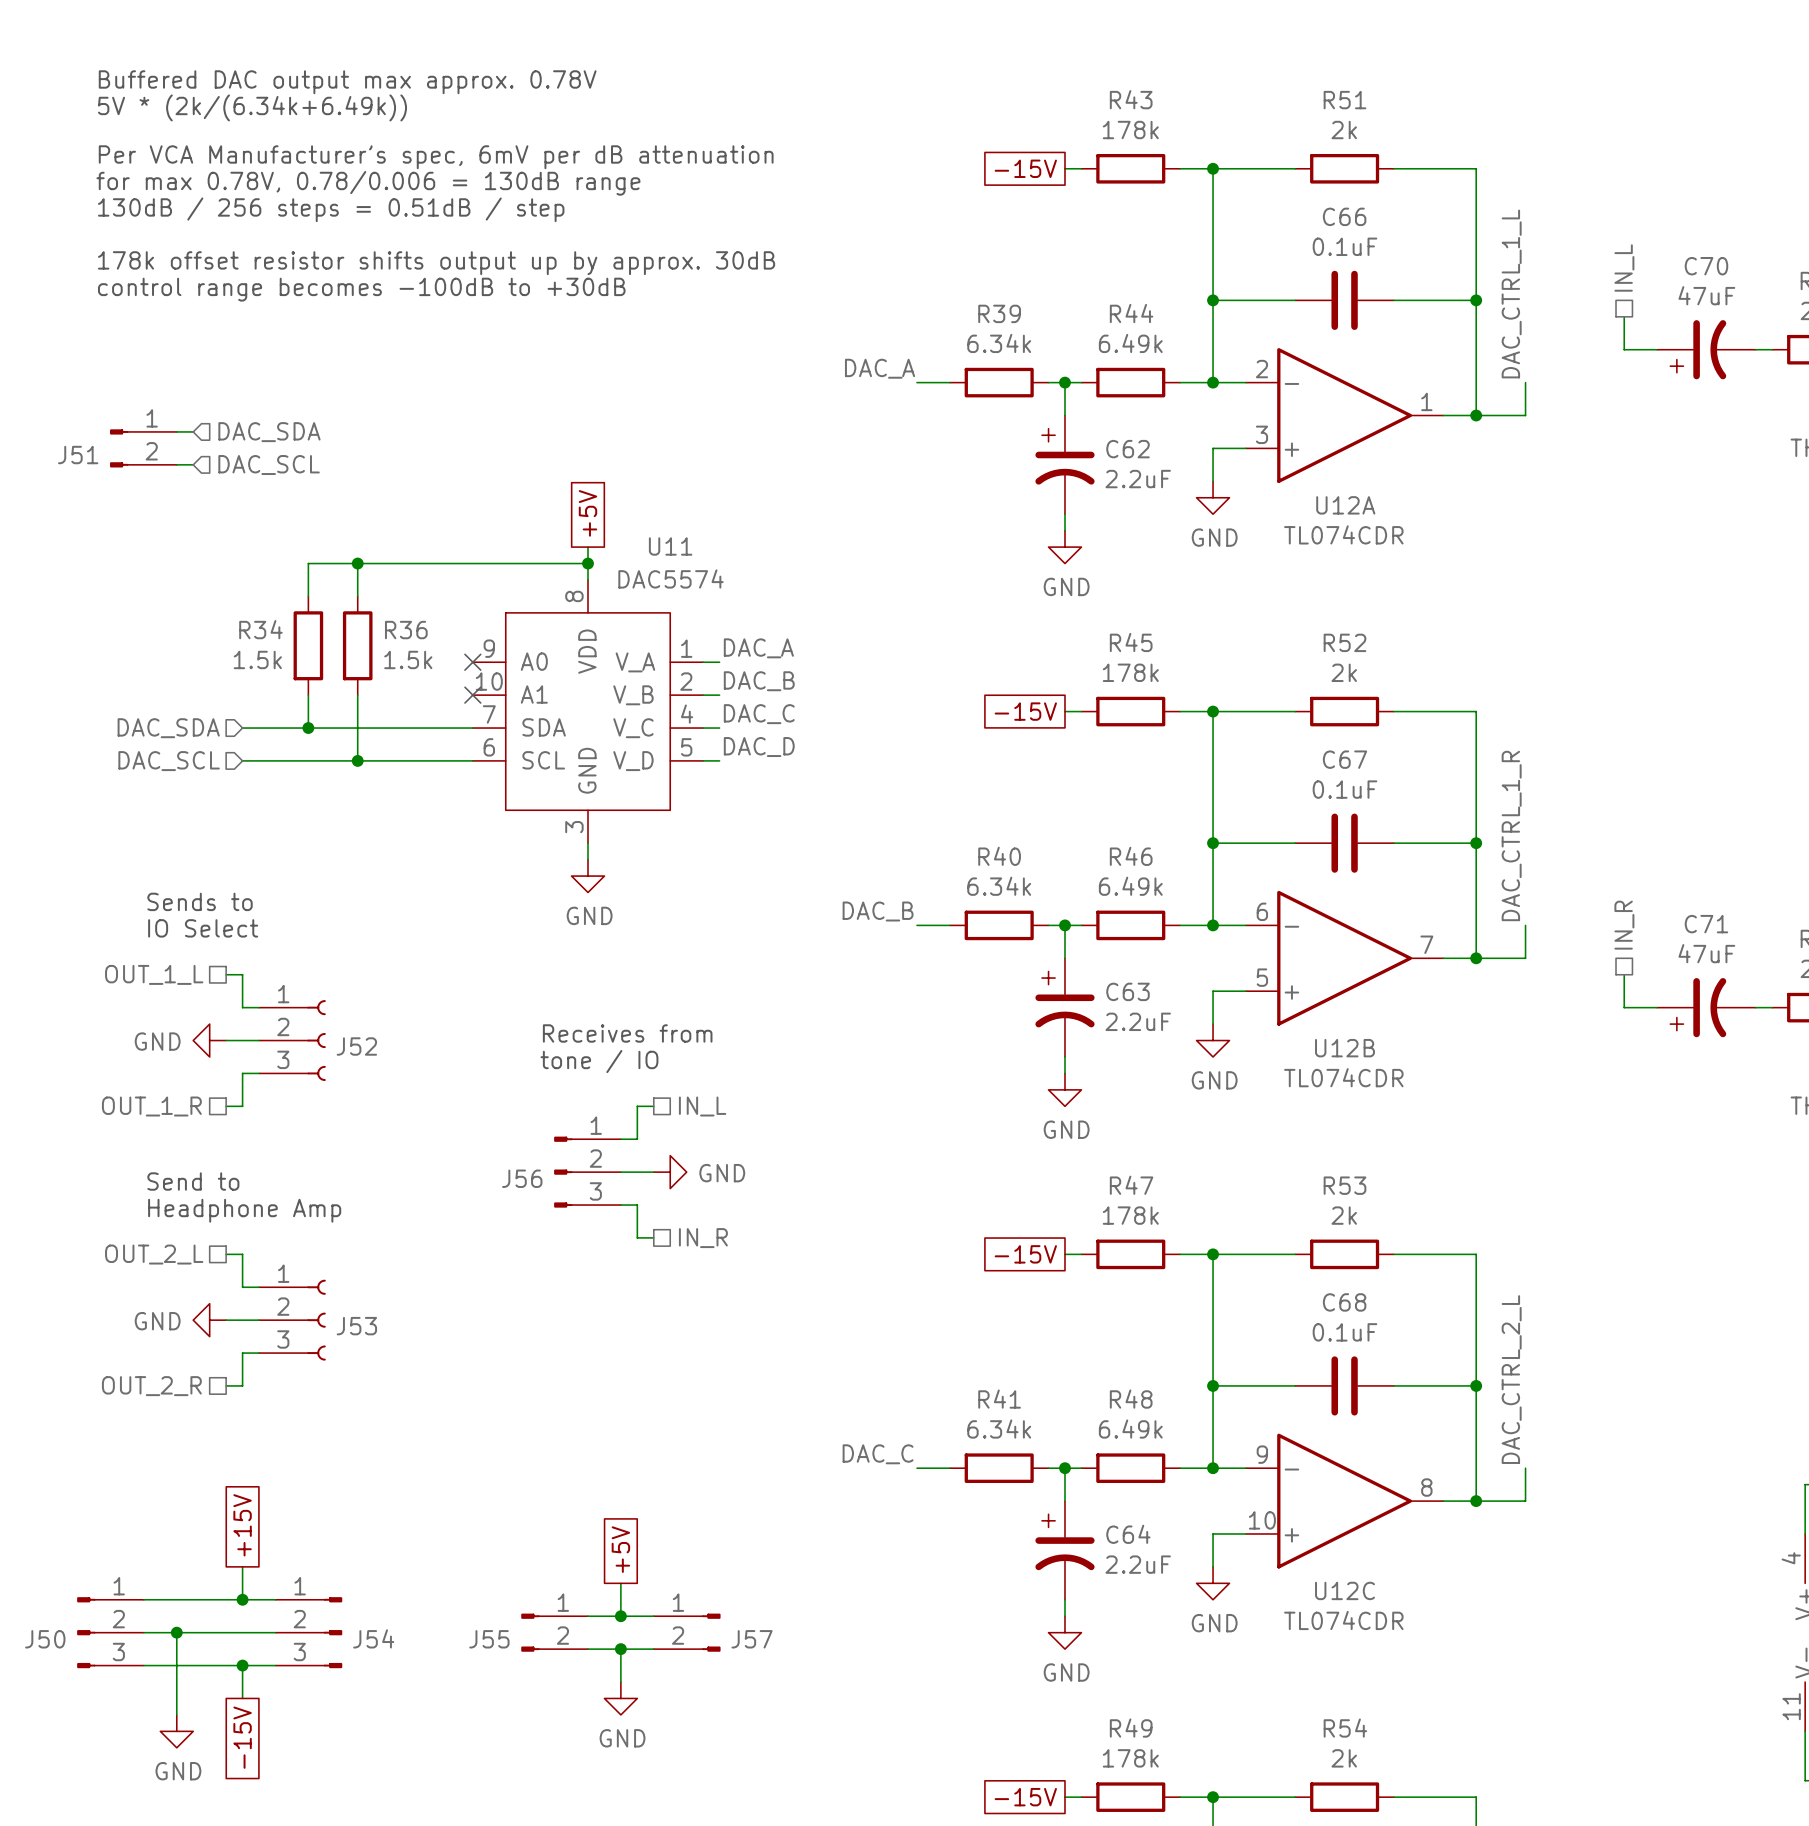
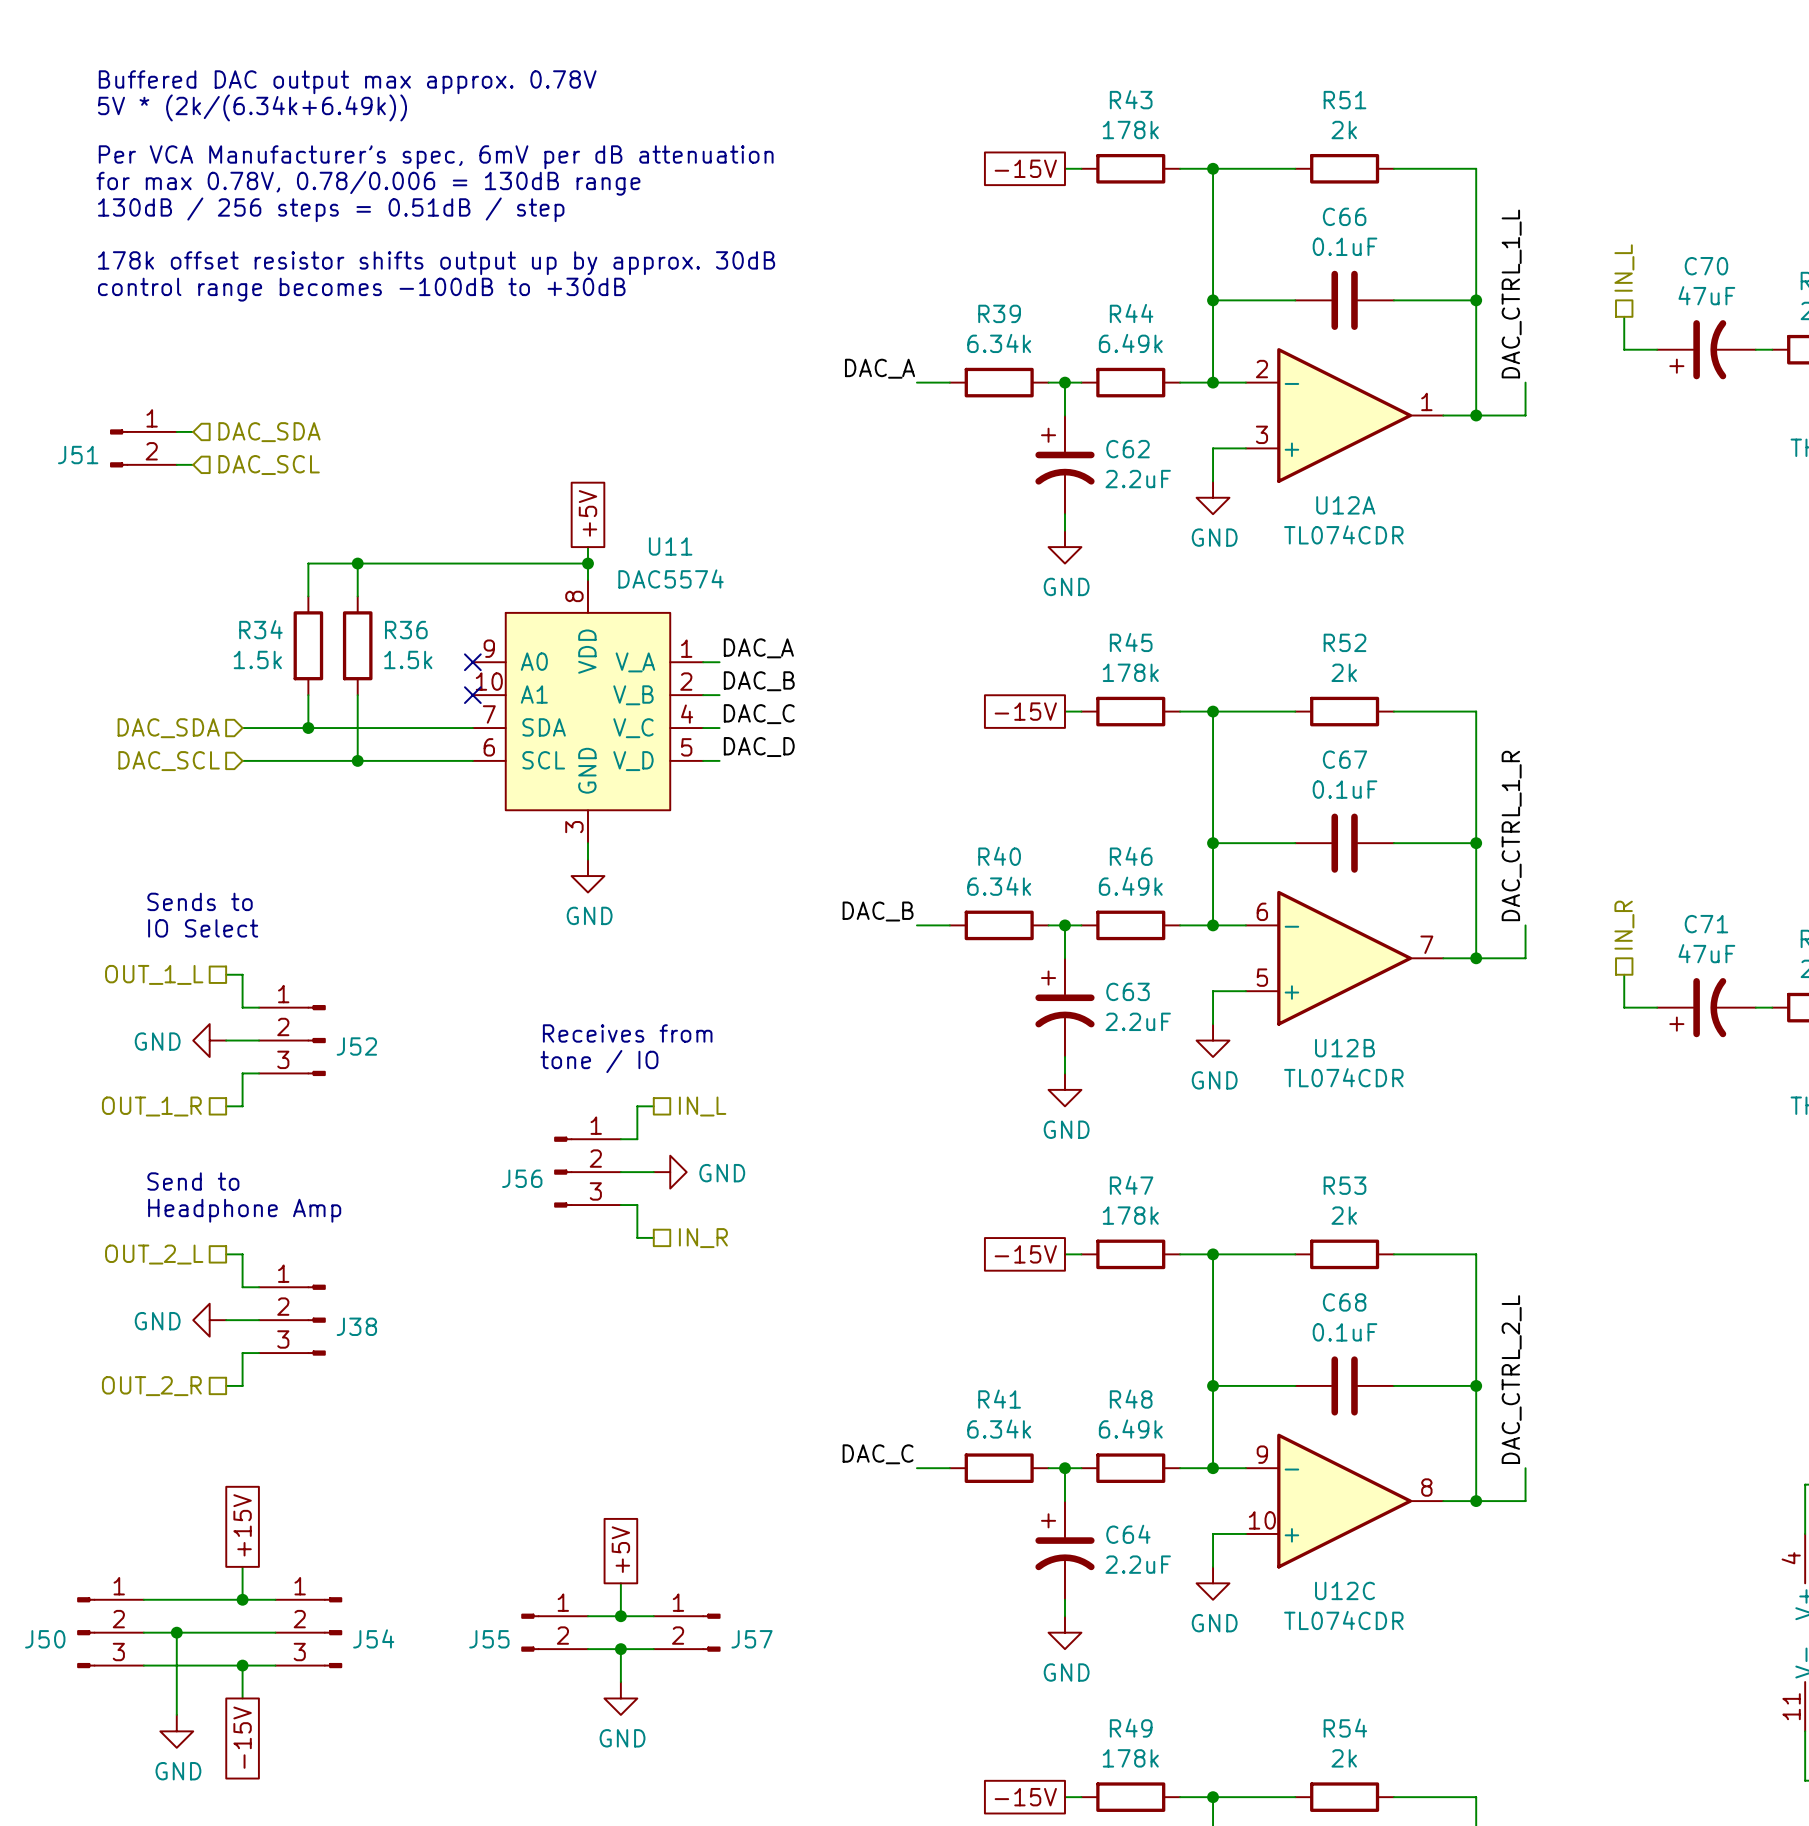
J52 symbol: [259, 1000, 326, 1082] -> [259, 1005, 326, 1077]
J53: (292, 1320) -> none
J38: none -> (292, 1320)

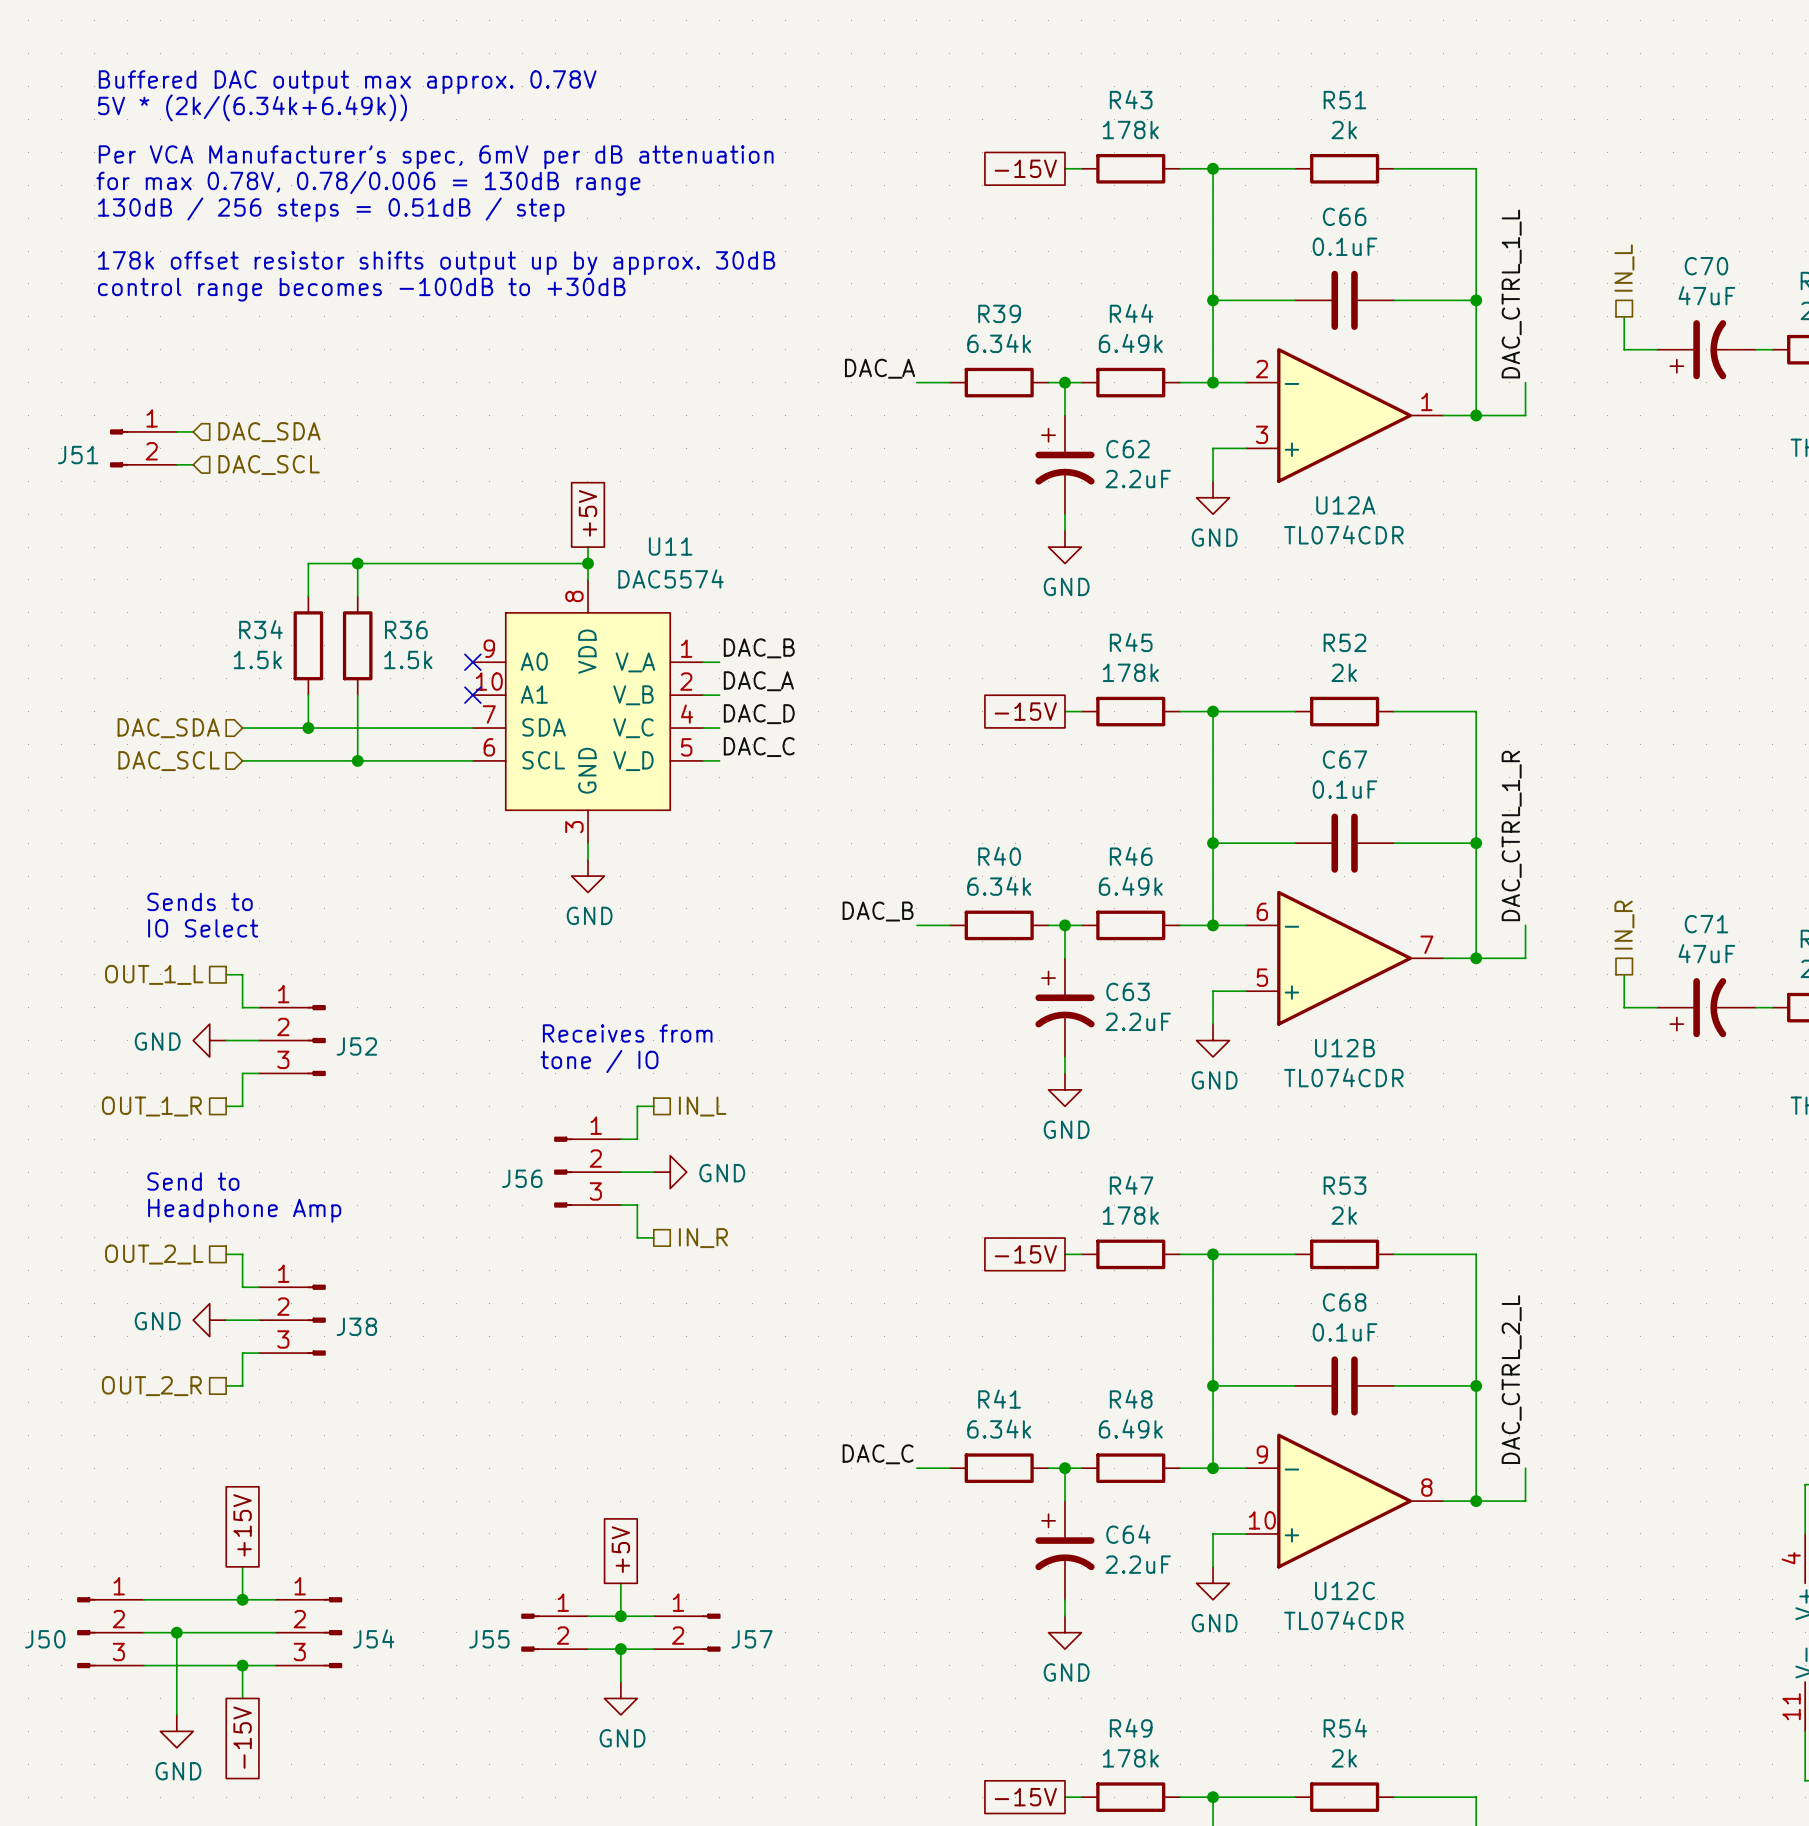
label: DAC_A (758, 648) -> DAC_B (759, 648)
label: DAC_B (759, 681) -> DAC_A (758, 681)
label: DAC_C (759, 714) -> DAC_D (759, 714)
label: DAC_D (759, 747) -> DAC_C (759, 747)

